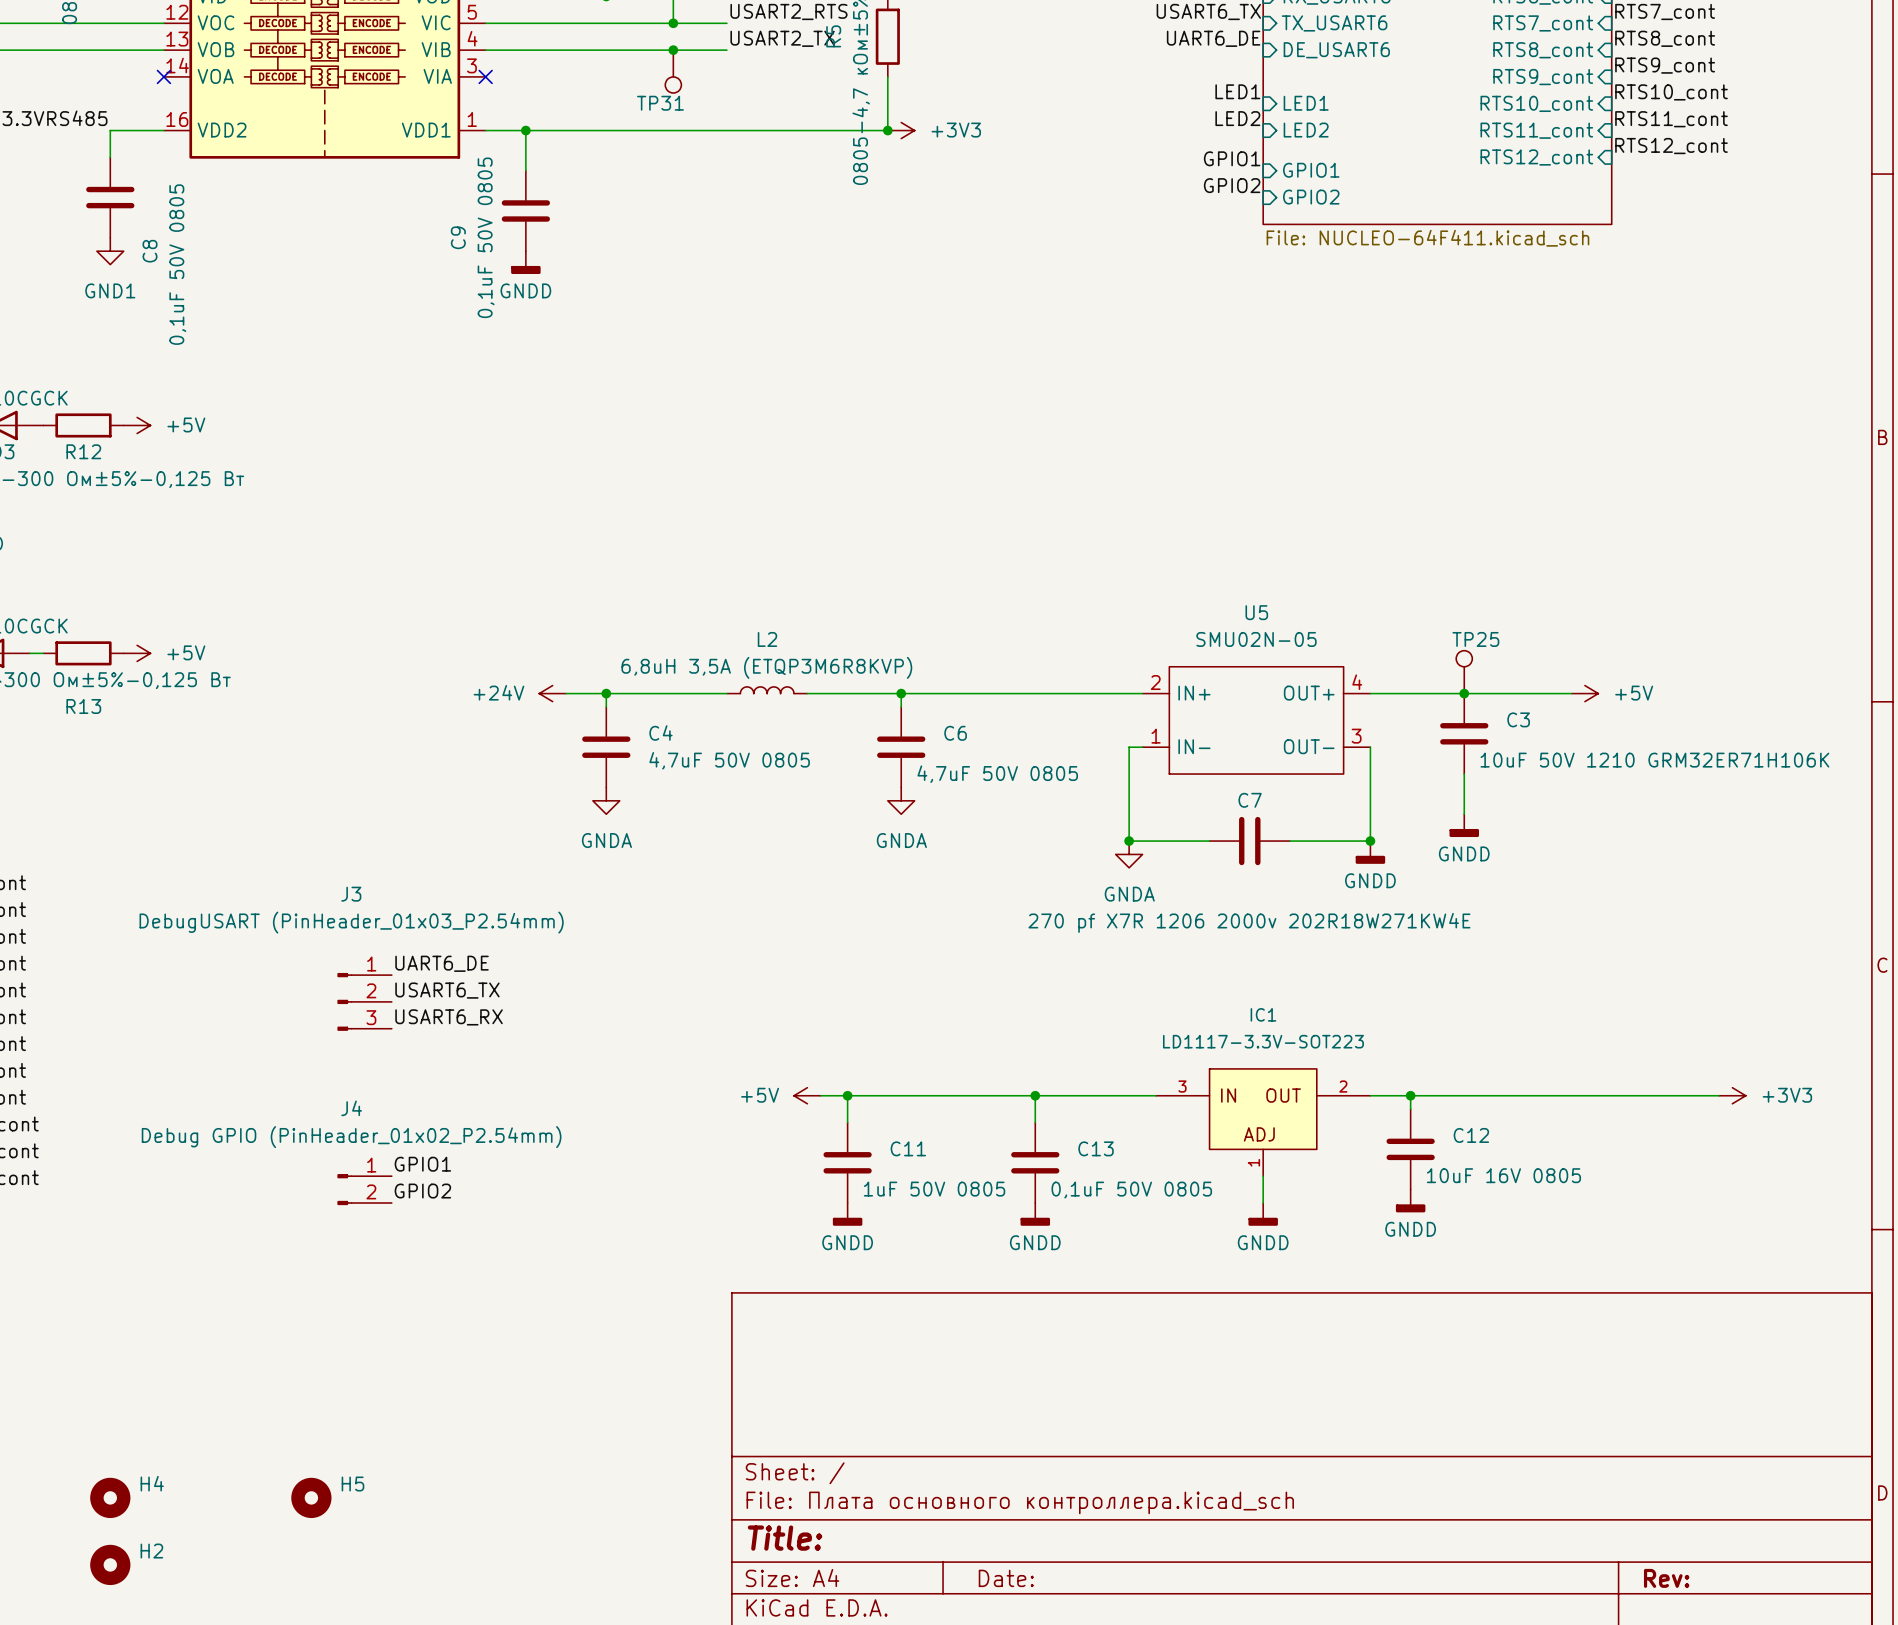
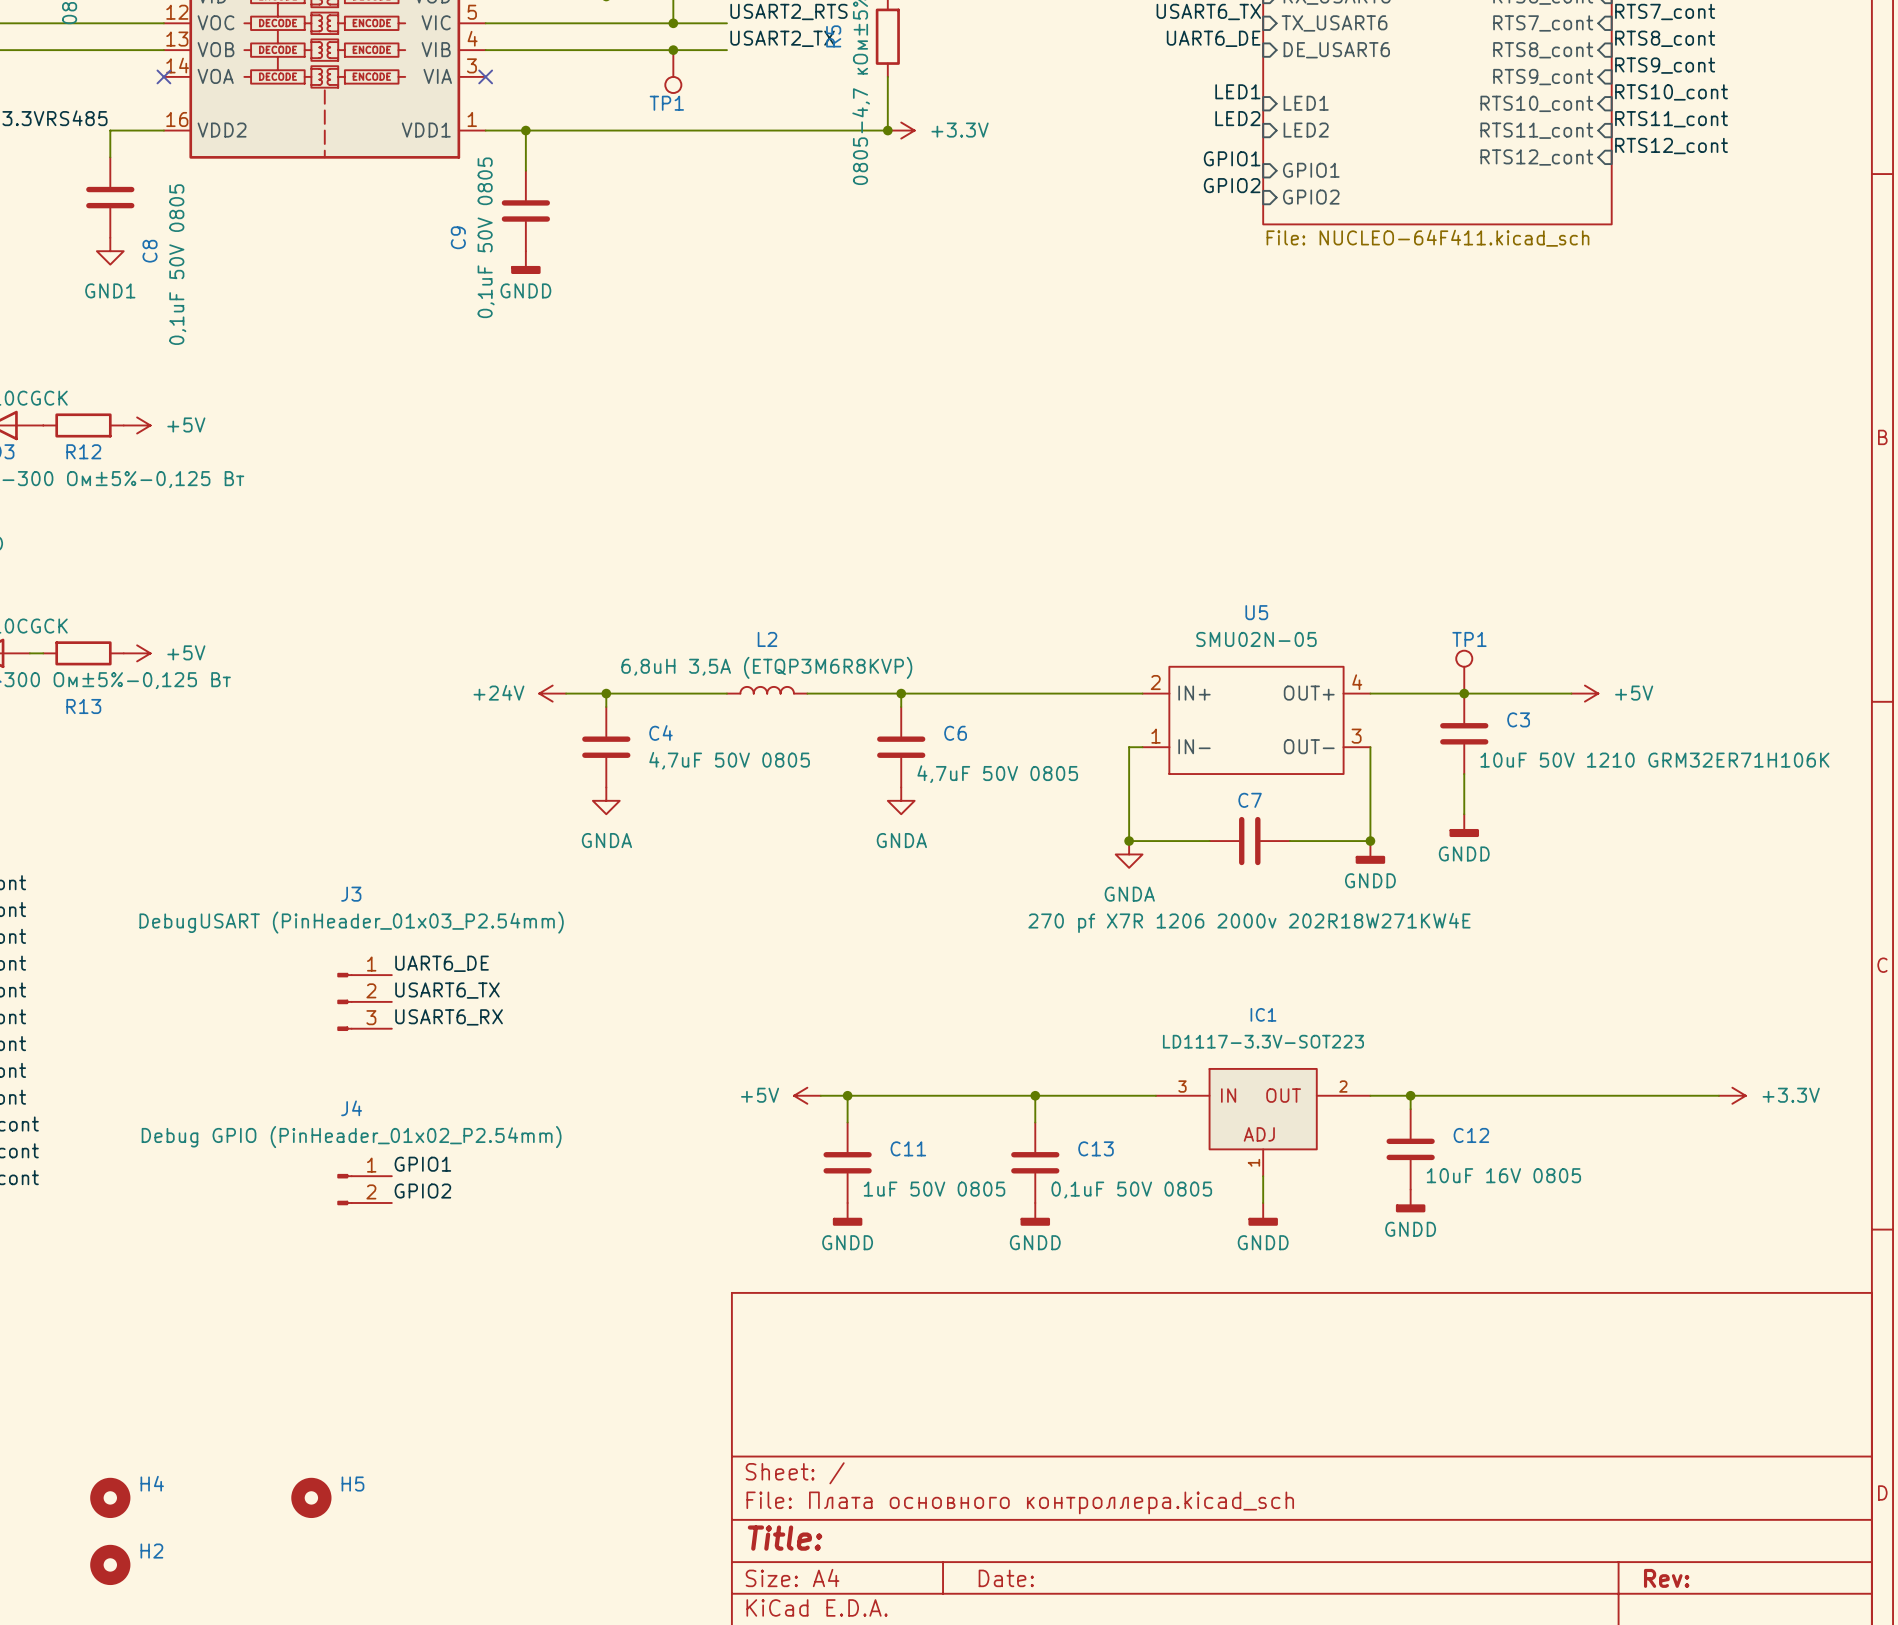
TP31 name: TP31 (660, 103) -> TP1 (666, 103)
power symbol: +3V3 (901, 130) -> +3.3V (901, 130)
TP25 name: TP25 (1475, 639) -> TP1 (1469, 639)
power symbol: +3V3 (1732, 1095) -> +3.3V (1732, 1095)

